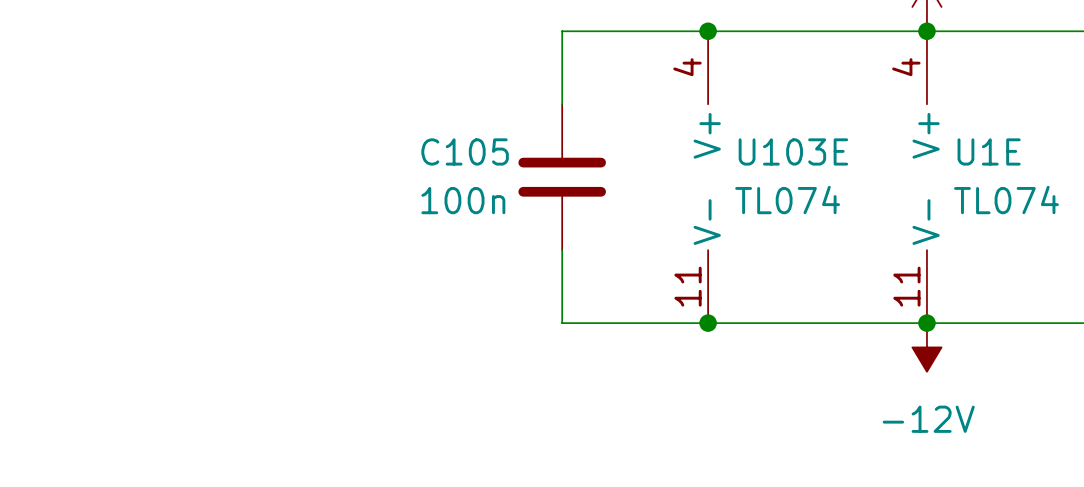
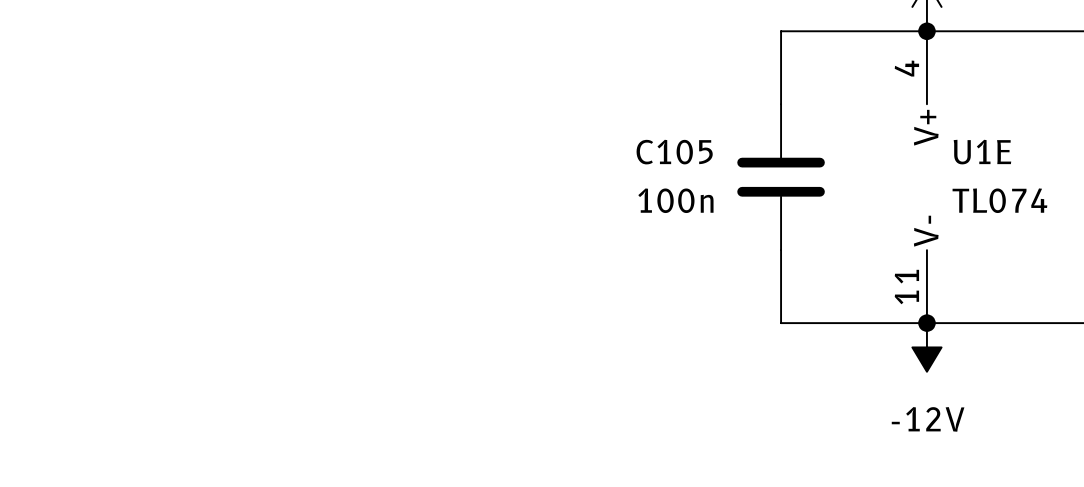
junction: (708, 31) -> none
wire: (781, 31) (562, 31) (562, 104) -> (781, 31) (781, 104)
C105 position: (562, 177) -> (781, 177)
U103E: TL074 (708, 177) -> none
wire: (562, 250) (562, 323) (781, 323) -> (781, 250) (781, 323)
junction: (708, 323) -> none

